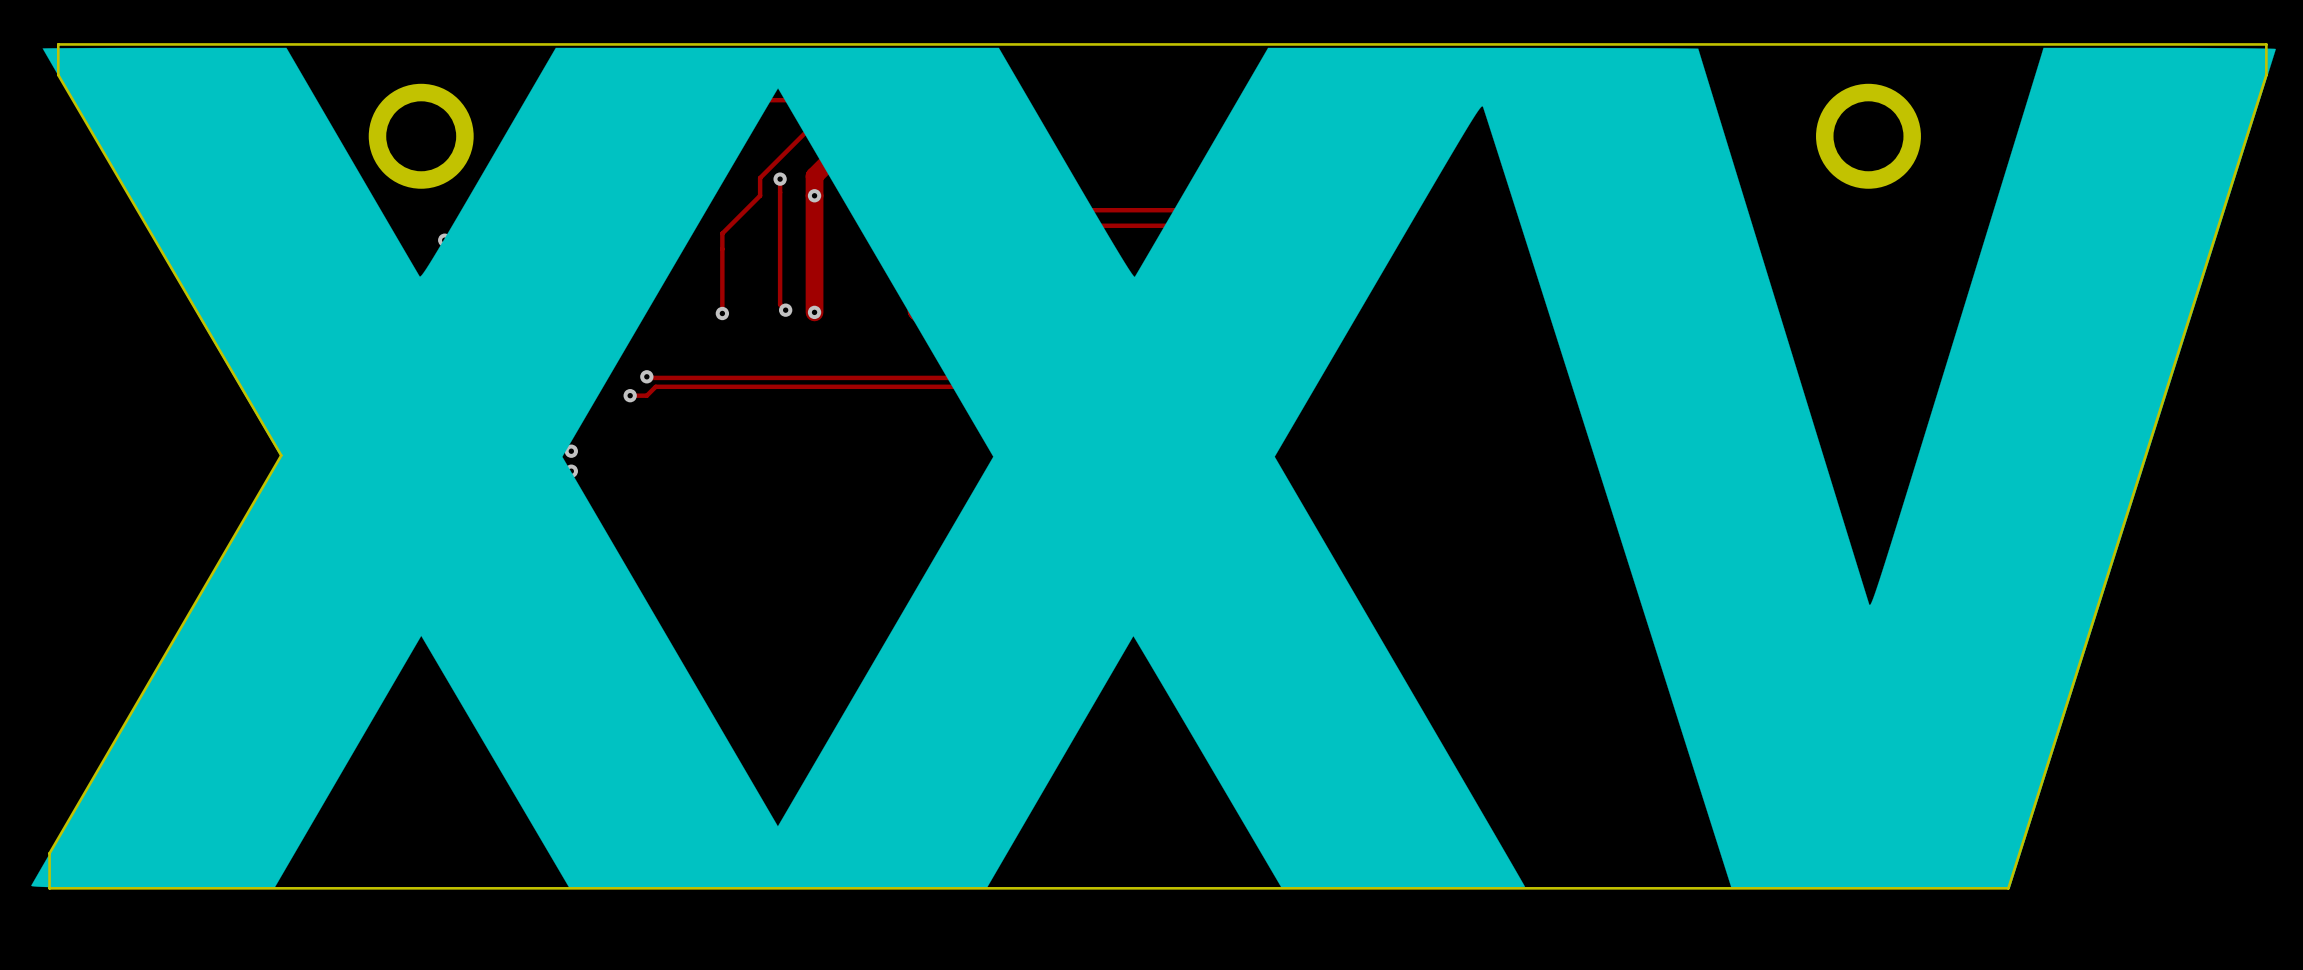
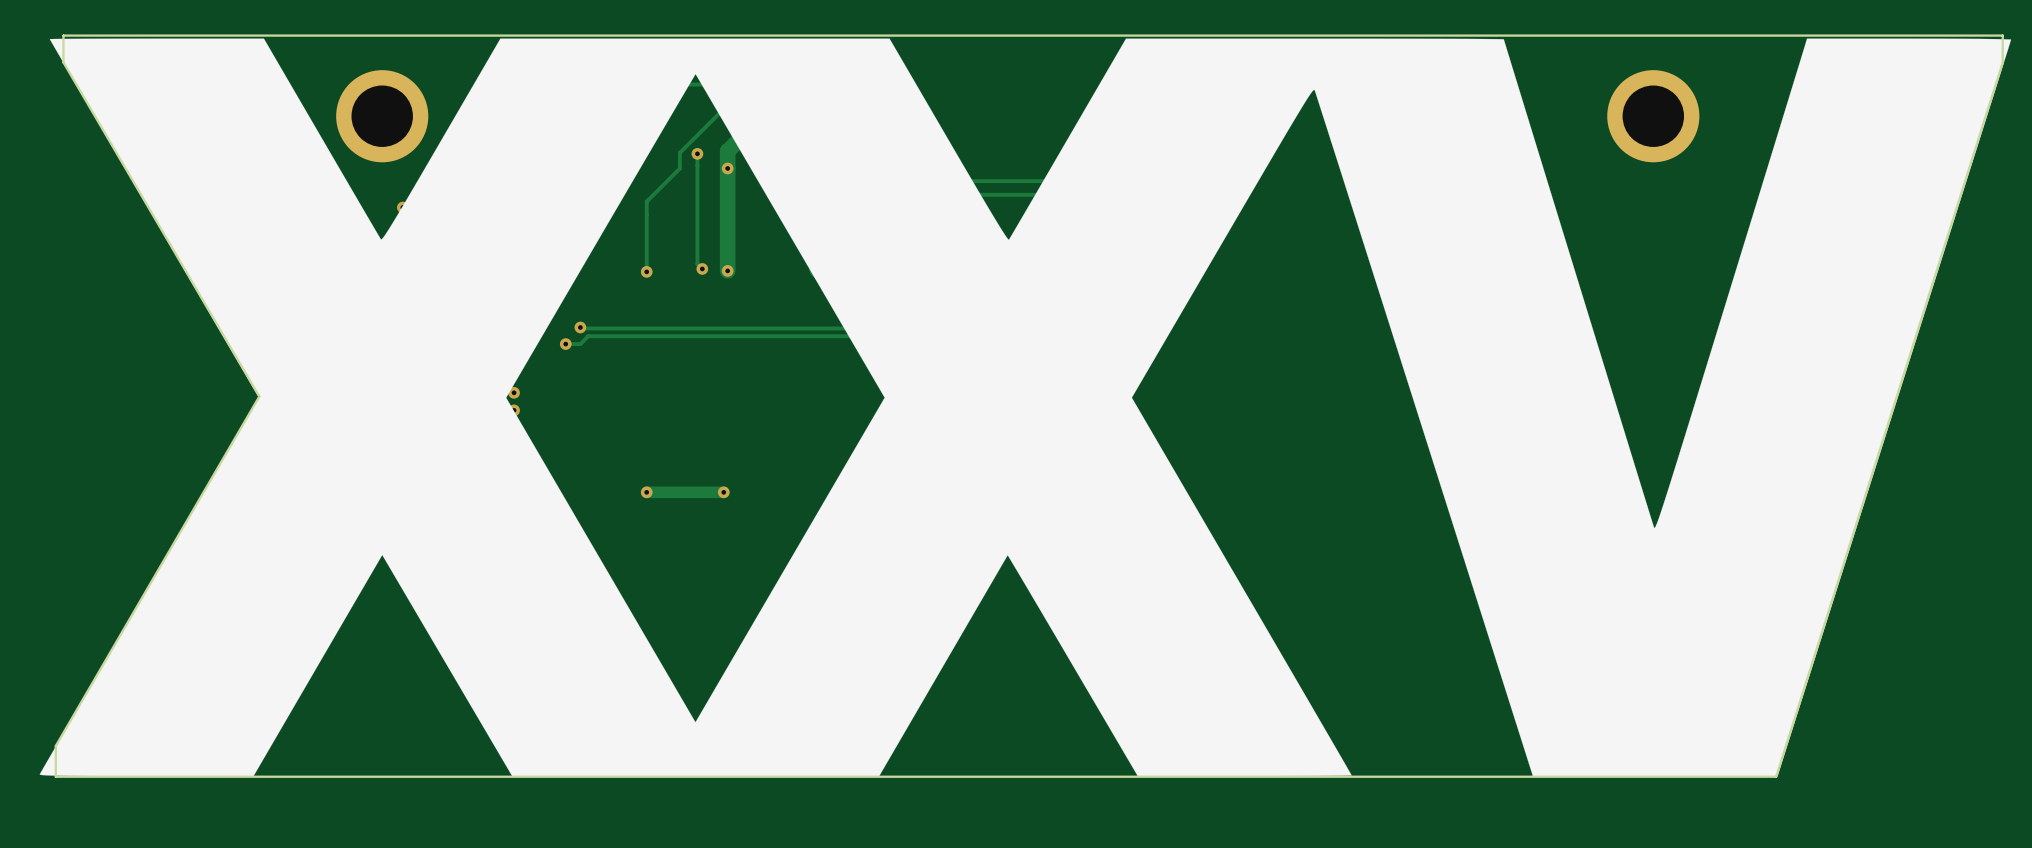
track: none -> (646, 492) (723, 492)
via: none -> (646, 492)
via: none -> (723, 492)

